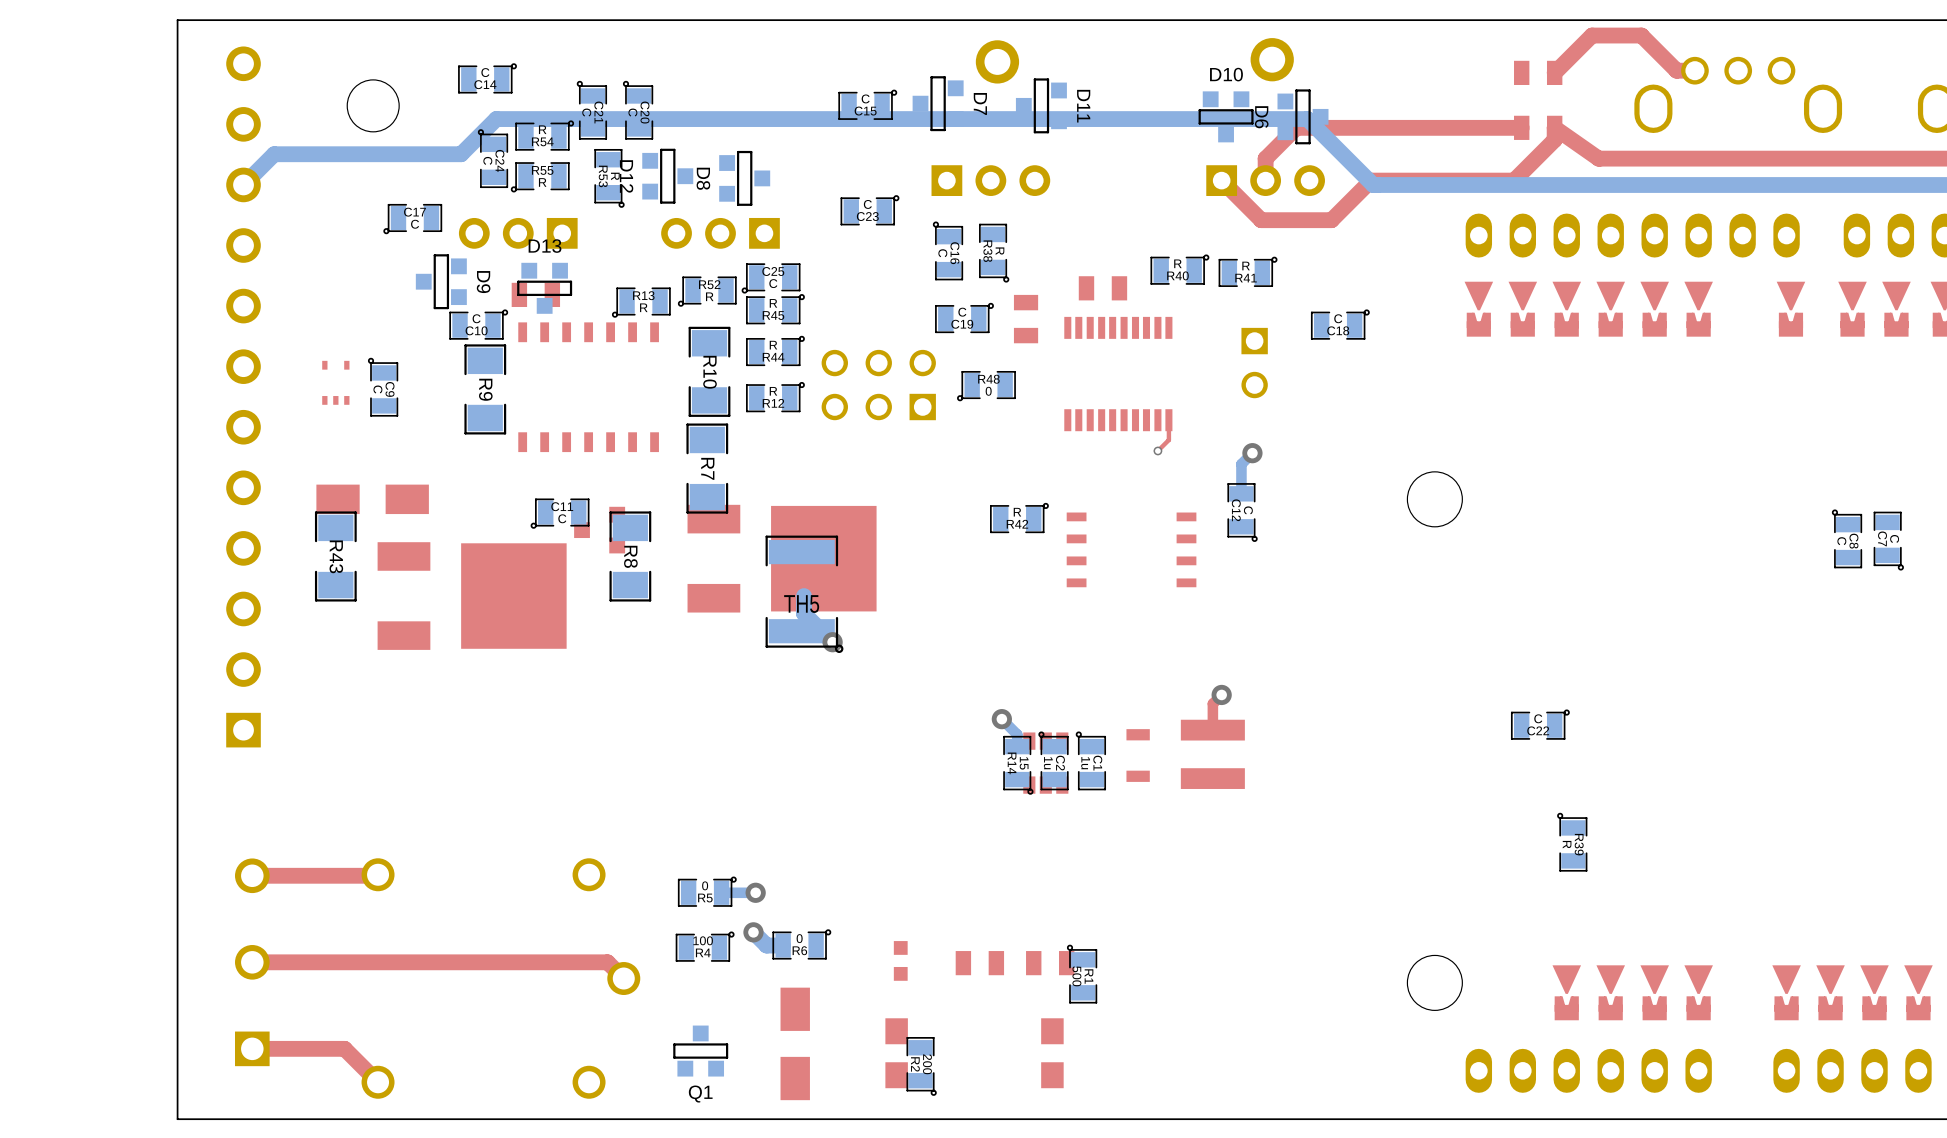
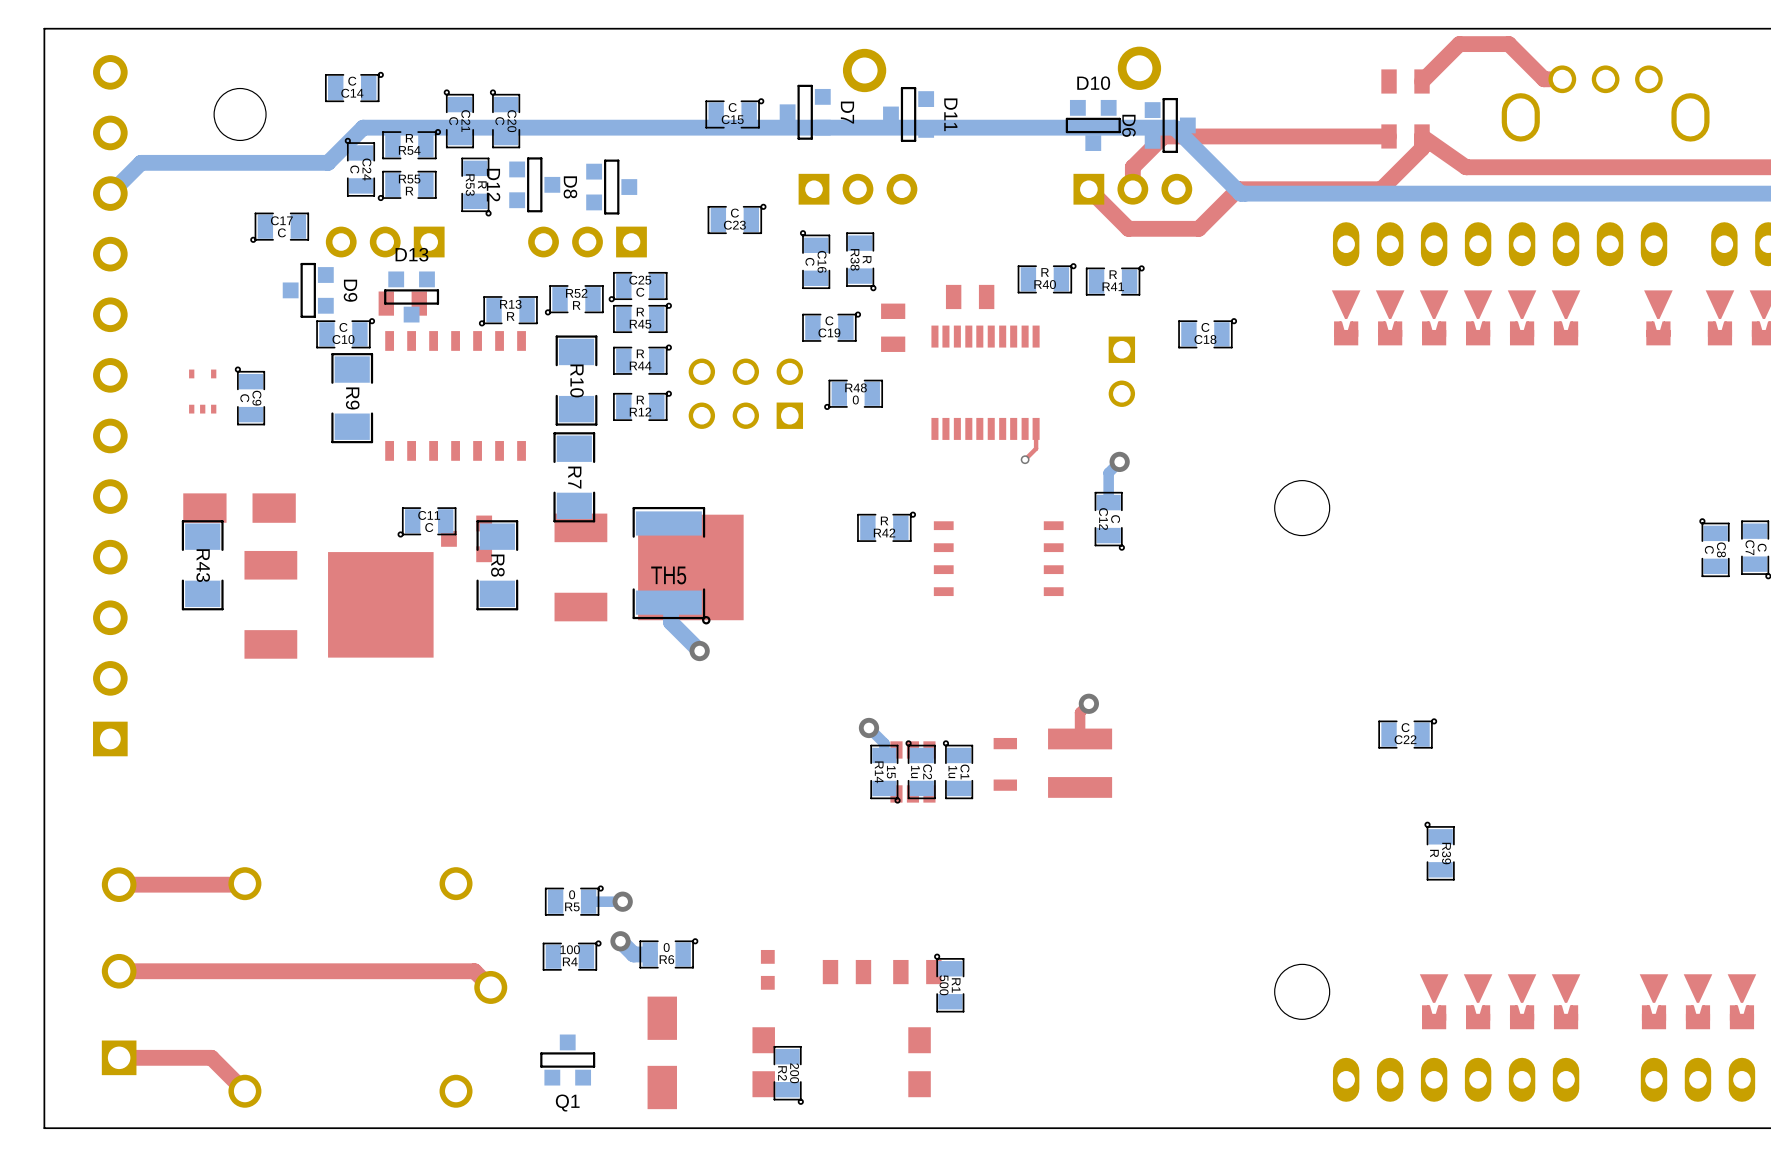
TH5 position: (804, 594) -> (671, 565)

